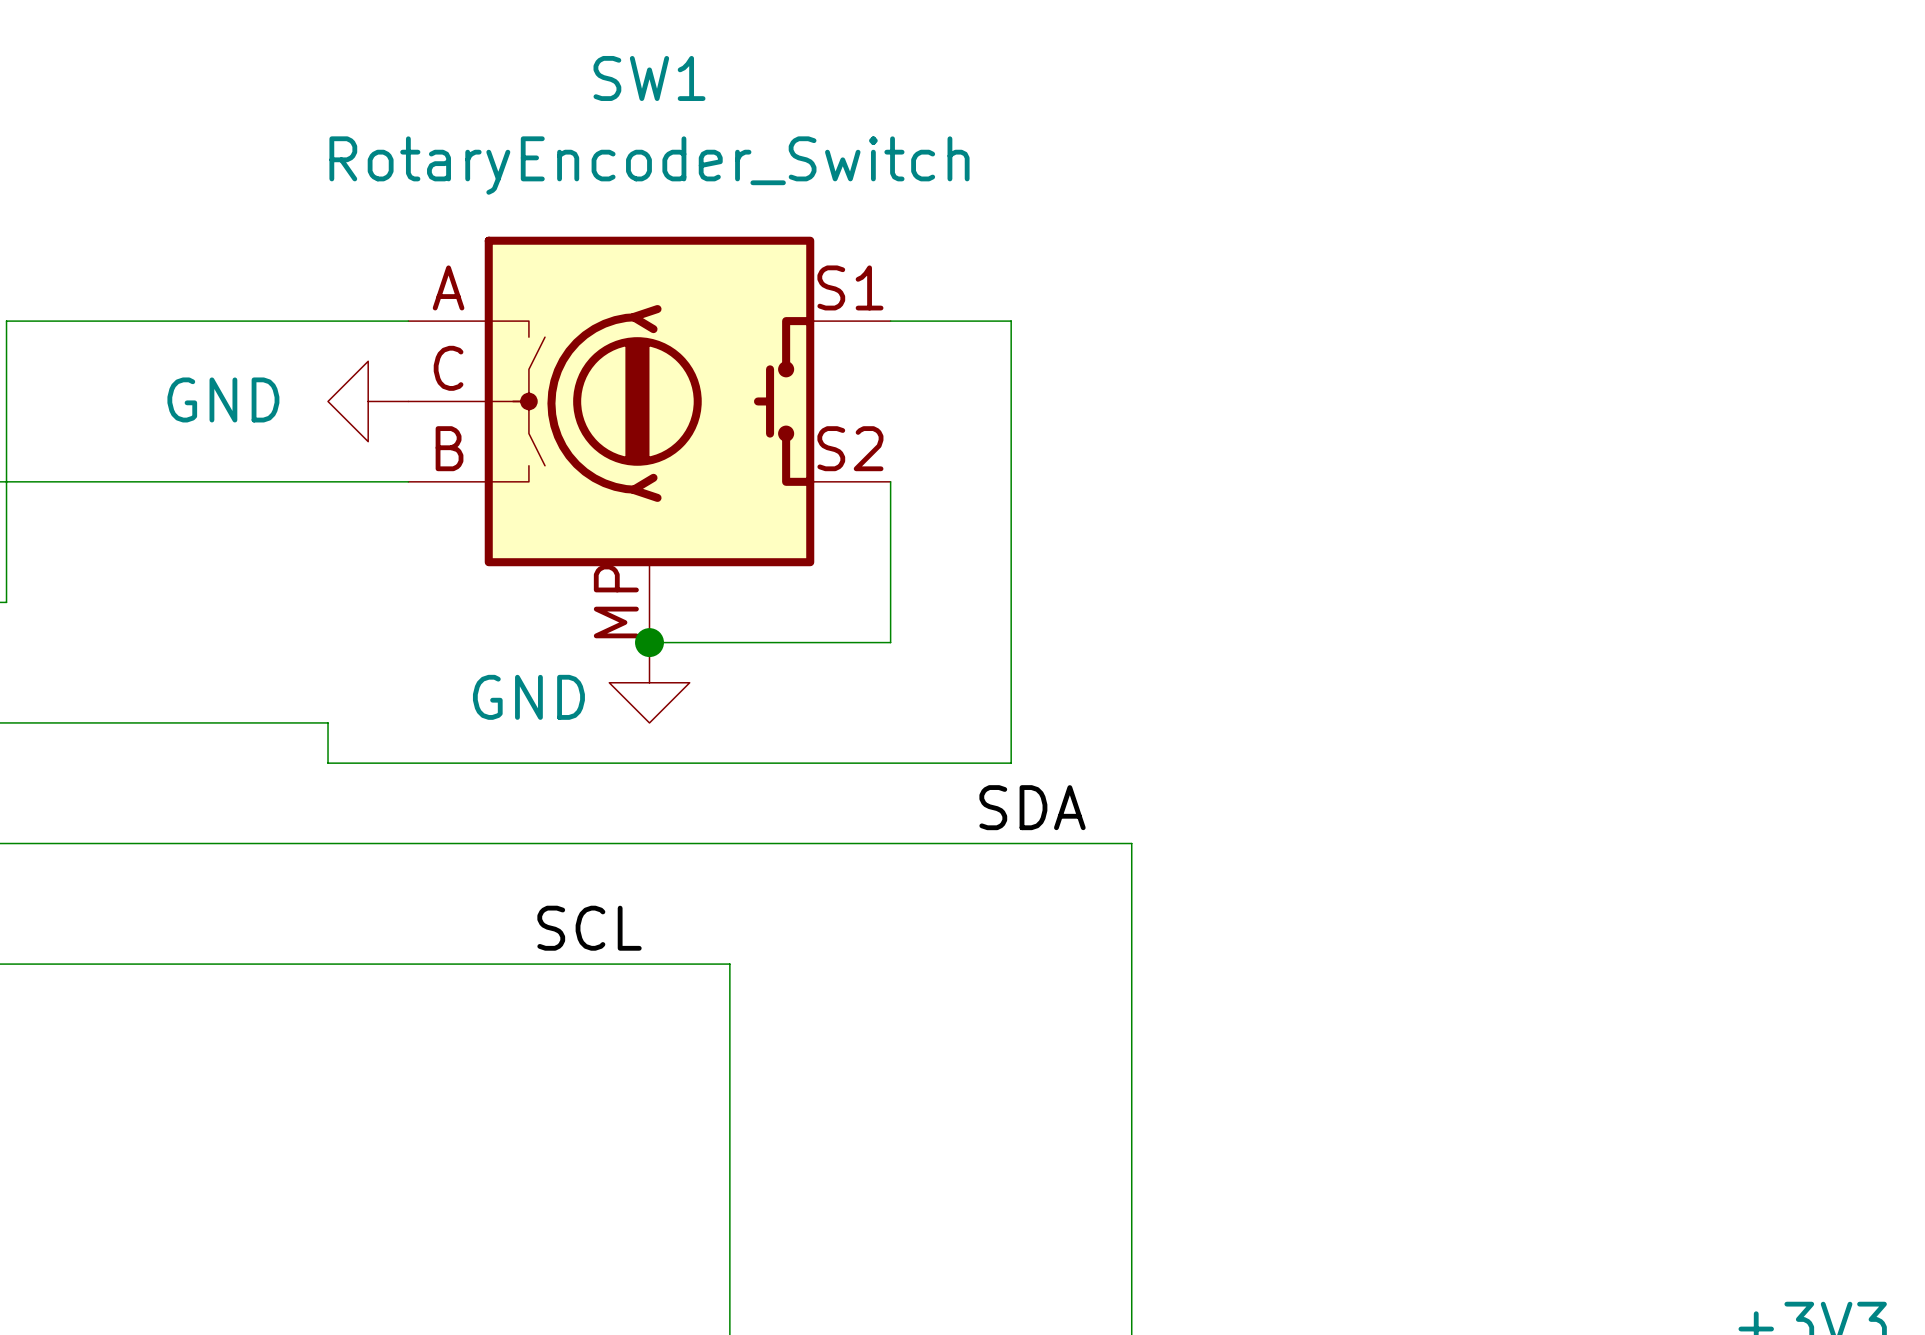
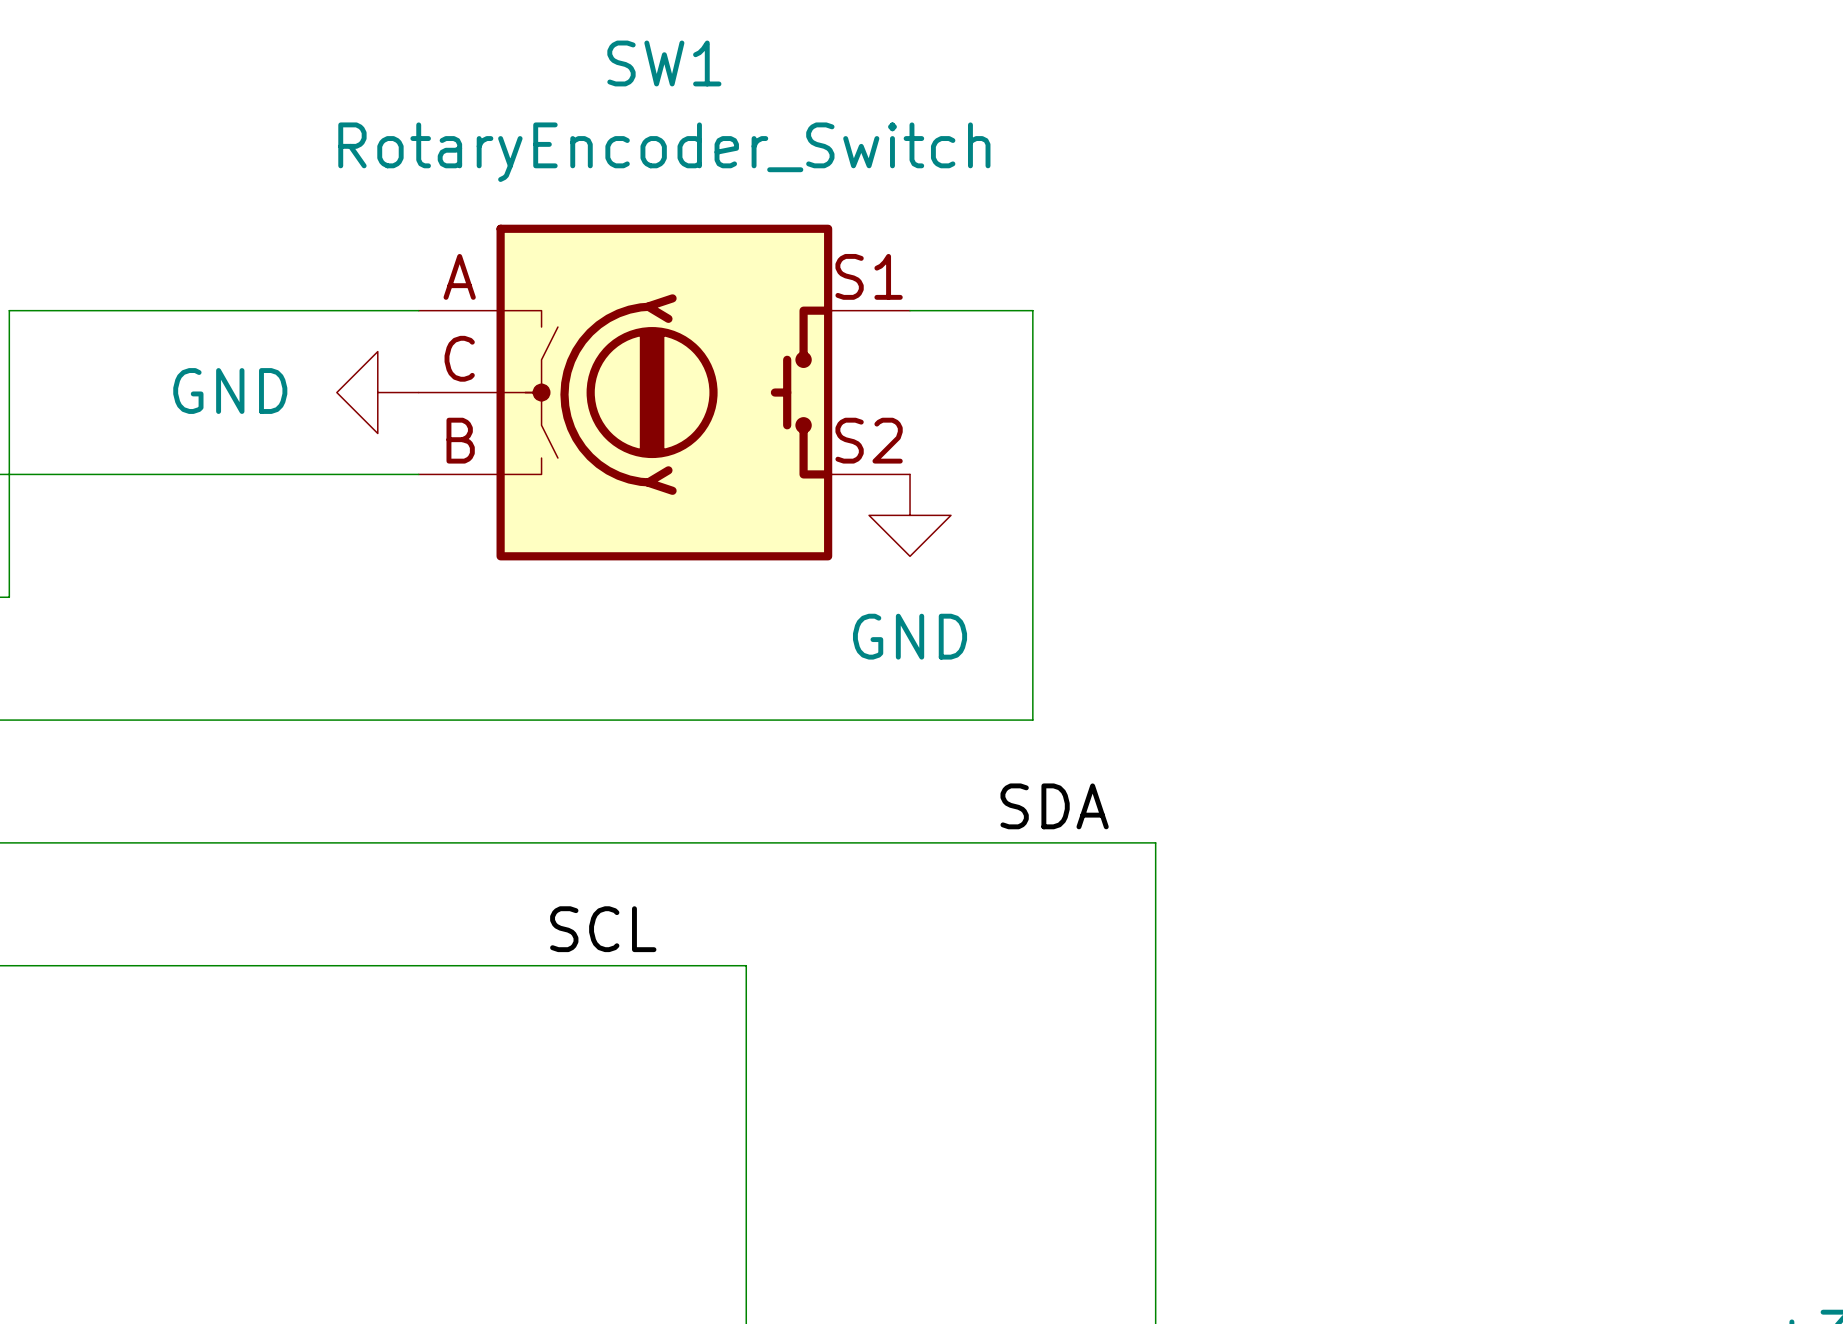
SW1 symbol: [408, 236, 891, 643] -> [418, 224, 911, 561]
wire: (890, 481) (890, 642) (649, 642) -> none
junction: (649, 642) -> none
power symbol position: GND (649, 682) -> GND (910, 515)
power symbol text position: GND (528, 697) -> GND (910, 636)
wire: (328, 722) (328, 763) (1011, 763) (1011, 722) -> (336, 720) (1032, 720)

